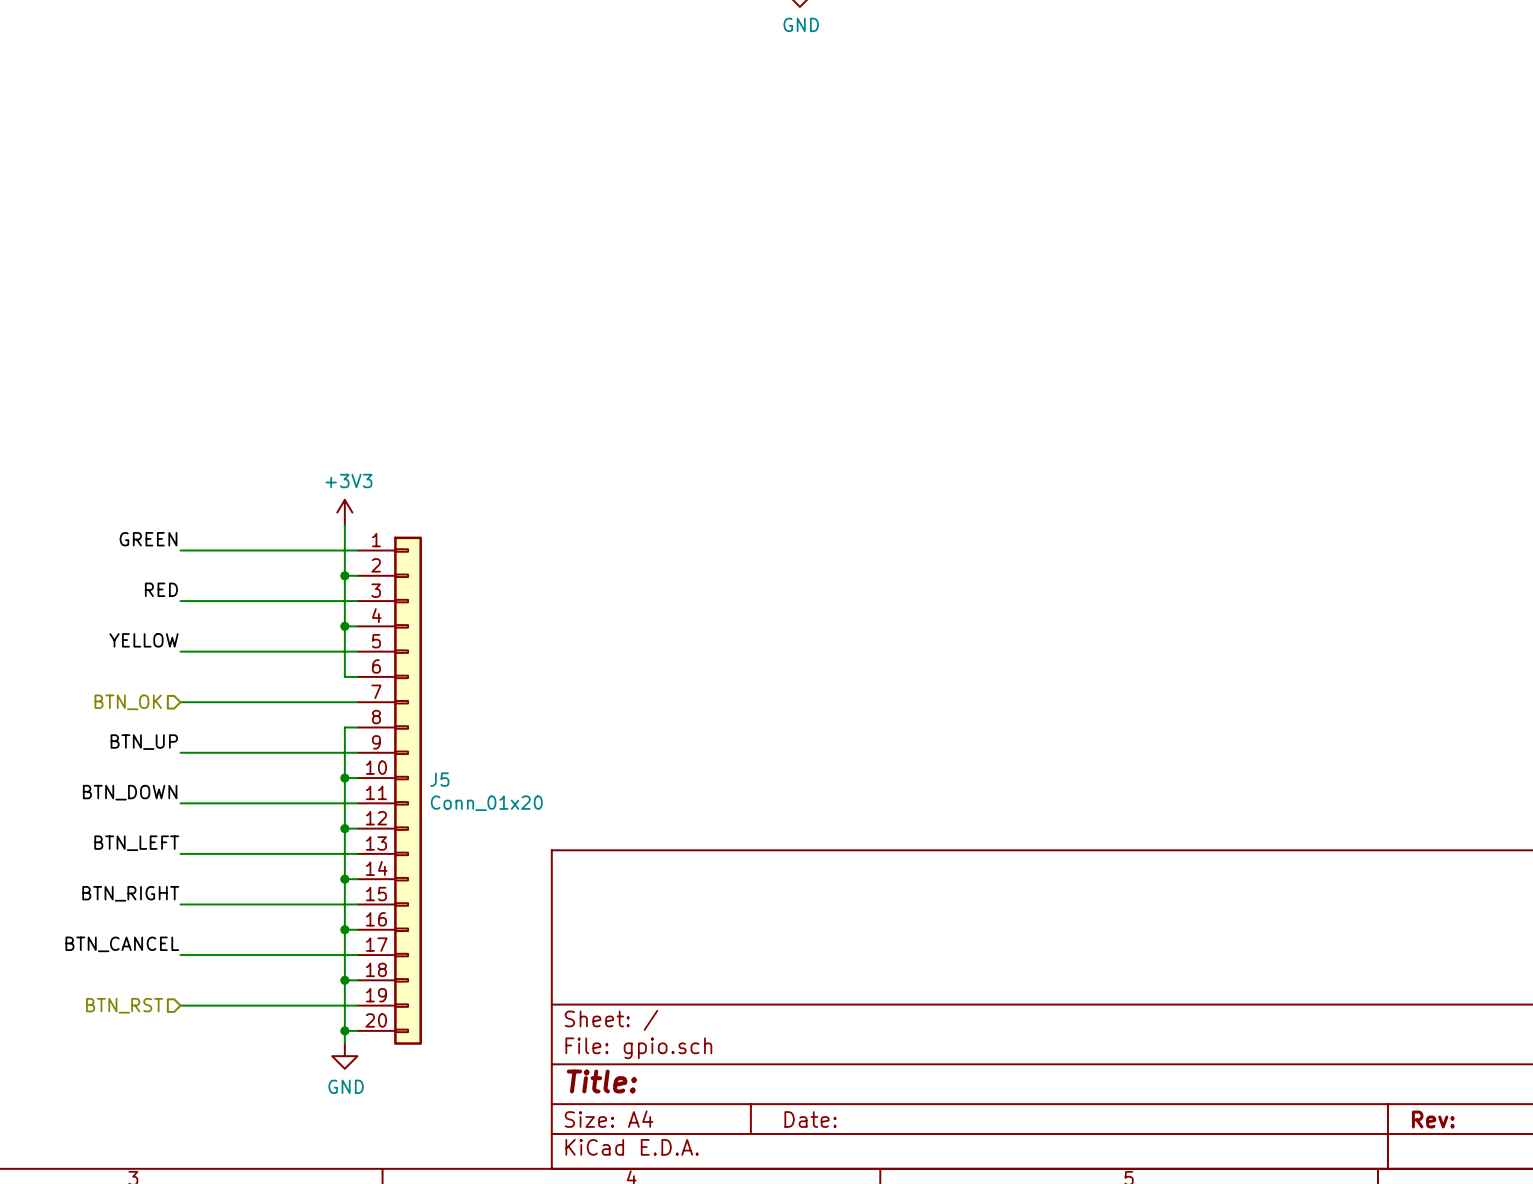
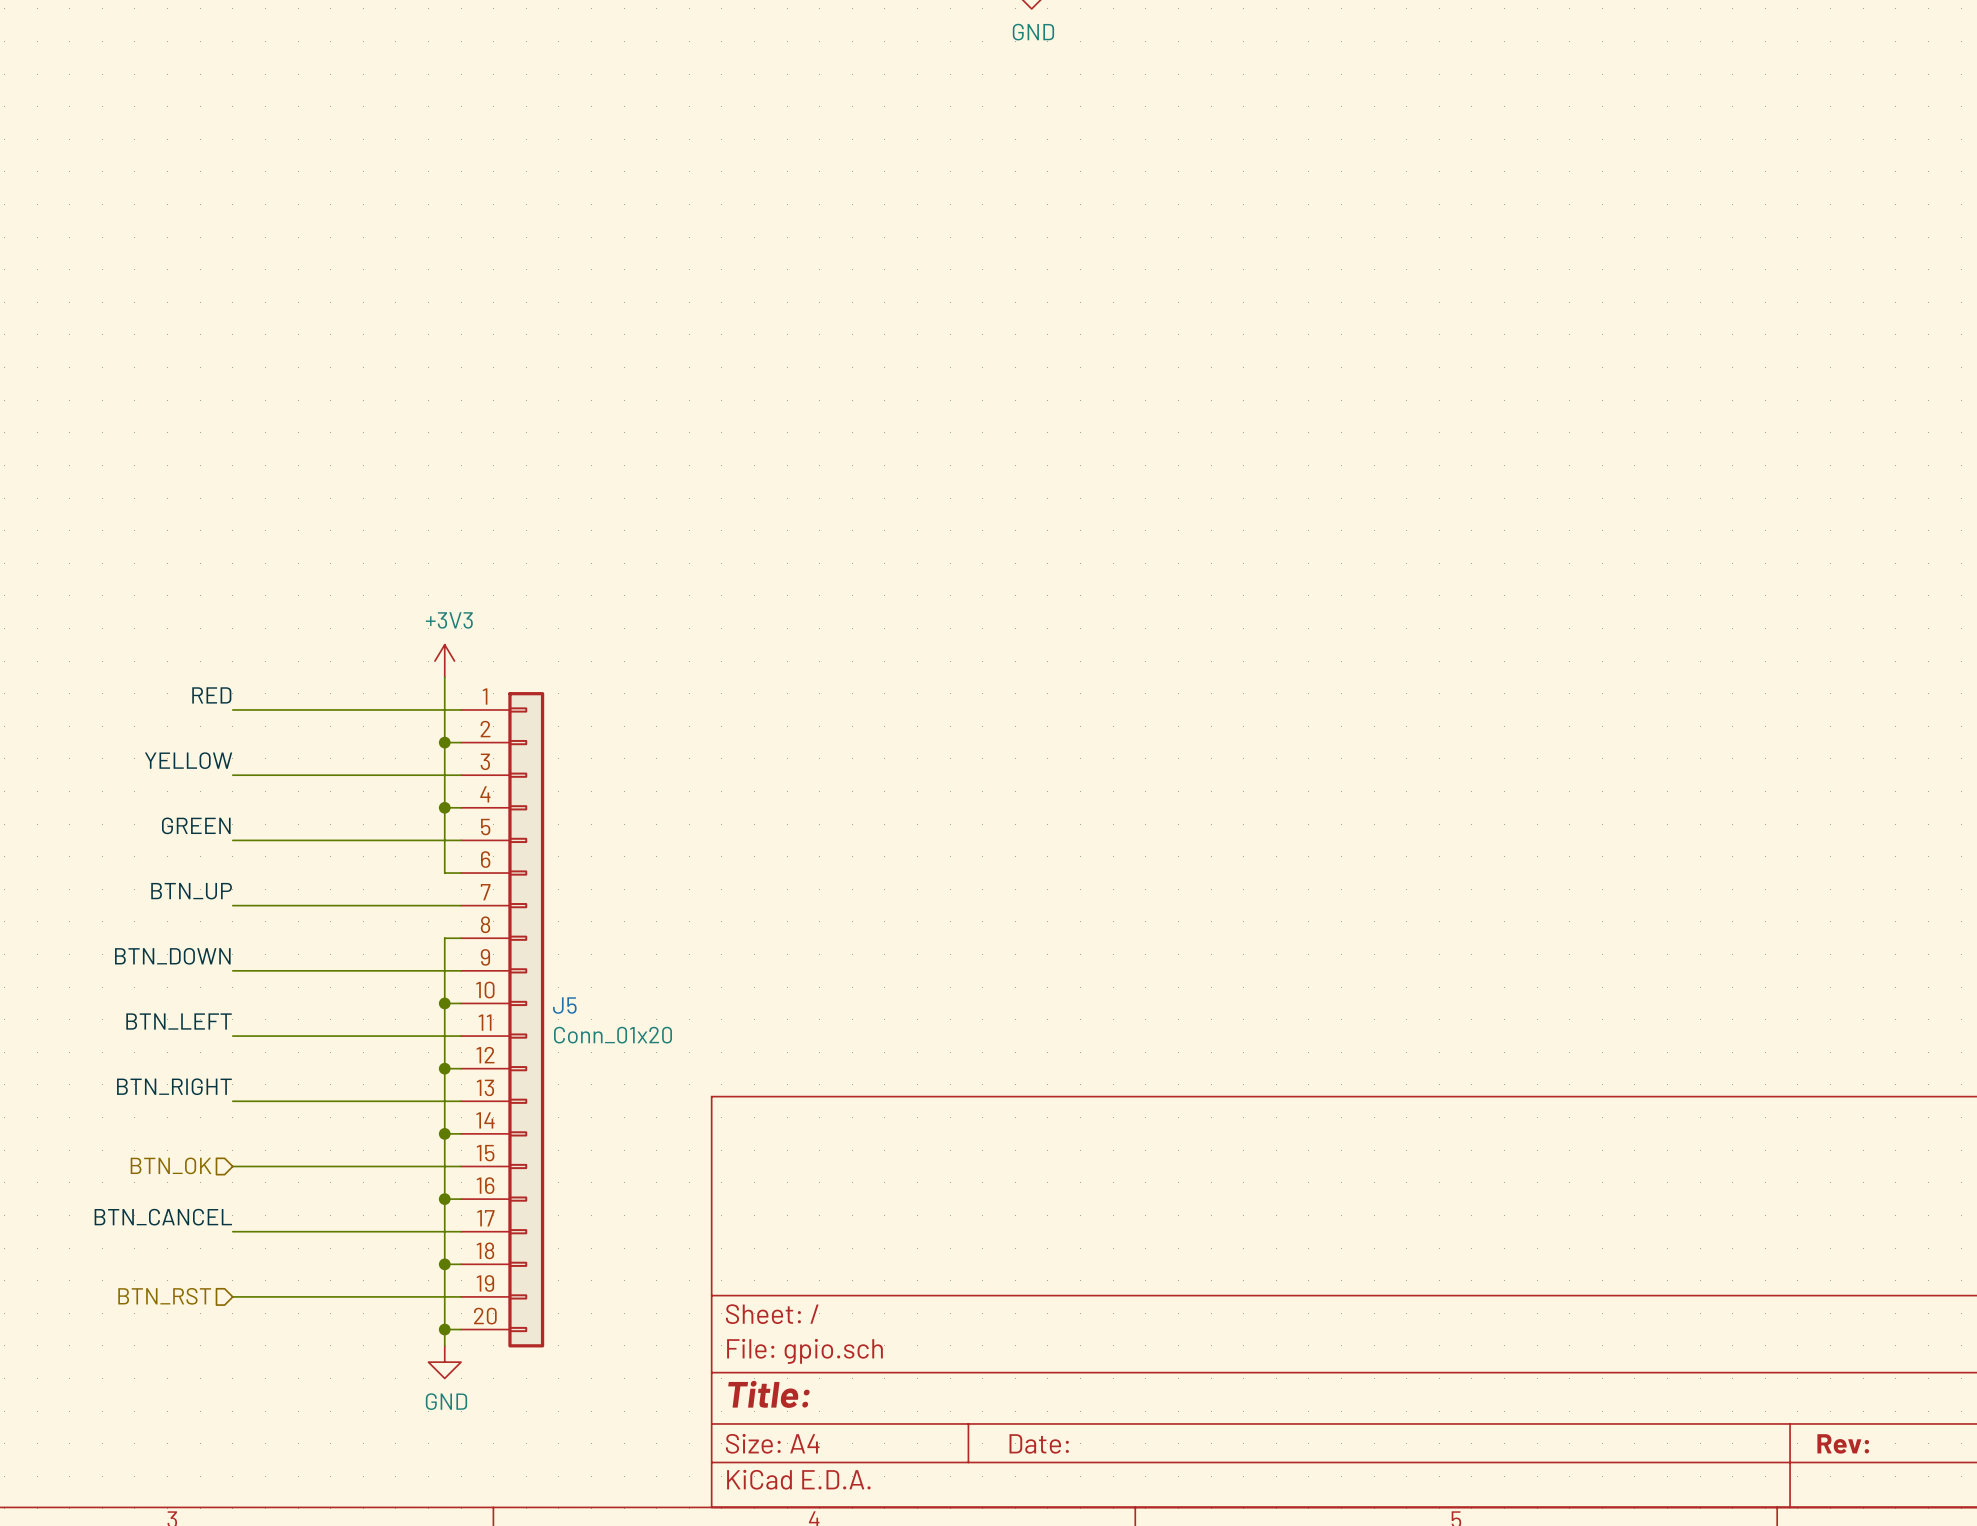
label: GREEN (148, 539) -> RED (211, 695)
label: RED (161, 589) -> YELLOW (188, 760)
label: YELLOW (143, 640) -> GREEN (196, 825)
label: none -> BTN_UP (191, 891)
hierarchical label position: BTN_OK (128, 702) -> BTN_OK (171, 1165)
label: BTN_UP (144, 742) -> BTN_DOWN (172, 956)
label: BTN_DOWN (130, 792) -> BTN_LEFT (179, 1021)
label: BTN_LEFT (136, 843) -> BTN_RIGHT (174, 1086)
label: BTN_RIGHT (130, 893) -> none

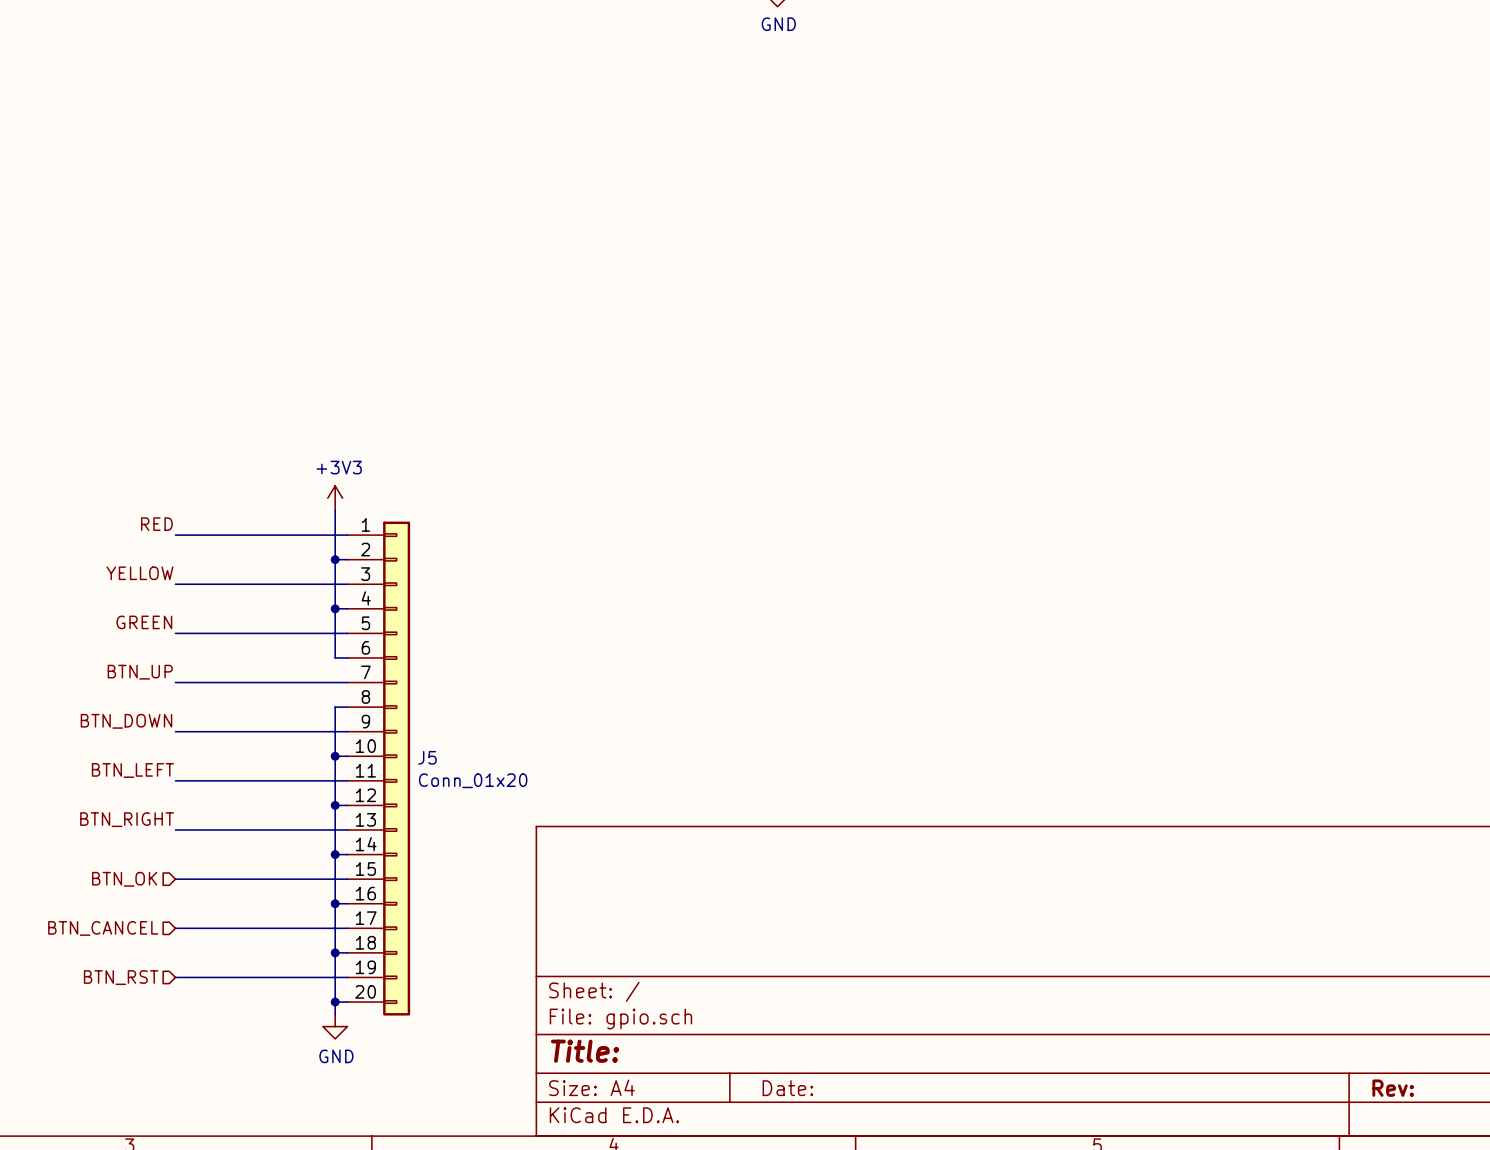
label: BTN_CANCEL (163, 1217) -> none
hierarchical label: none -> BTN_CANCEL (103, 928)

